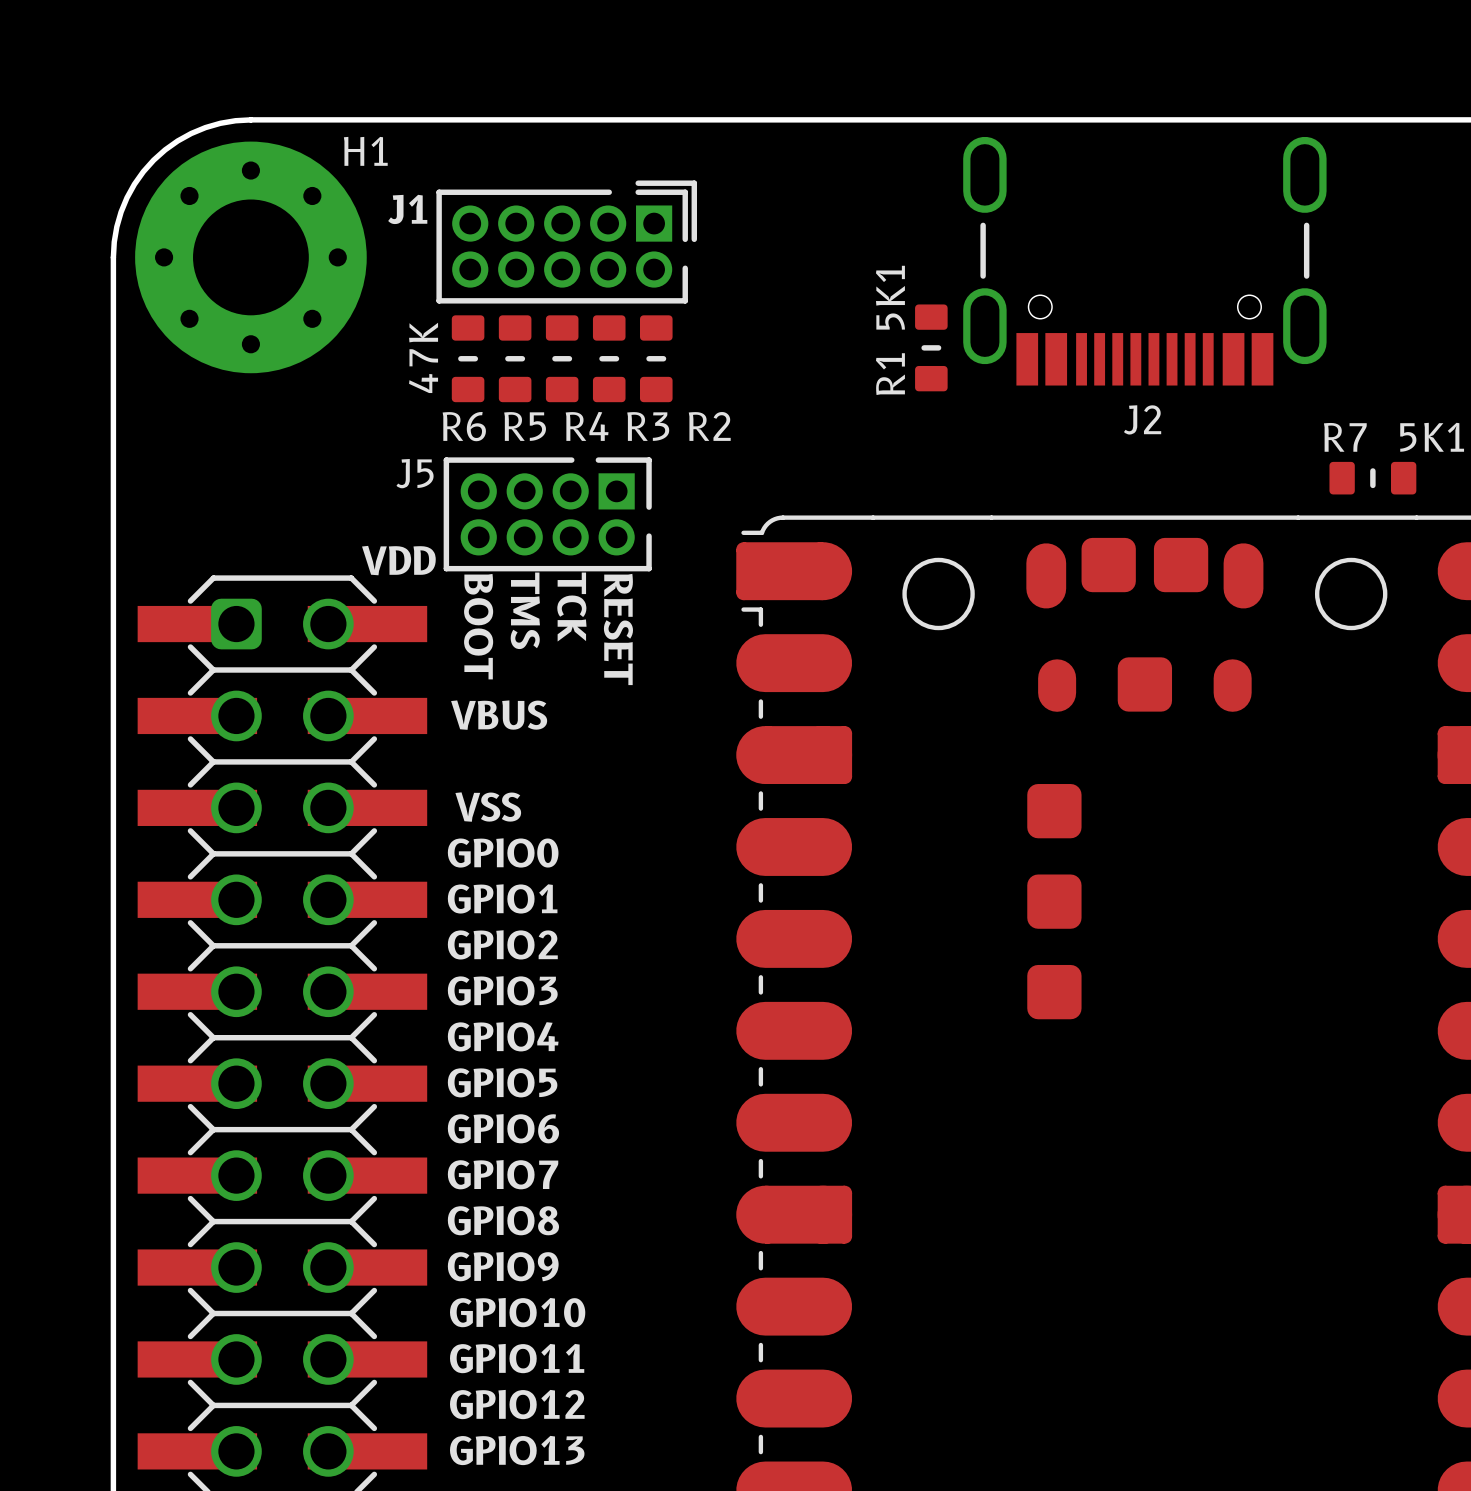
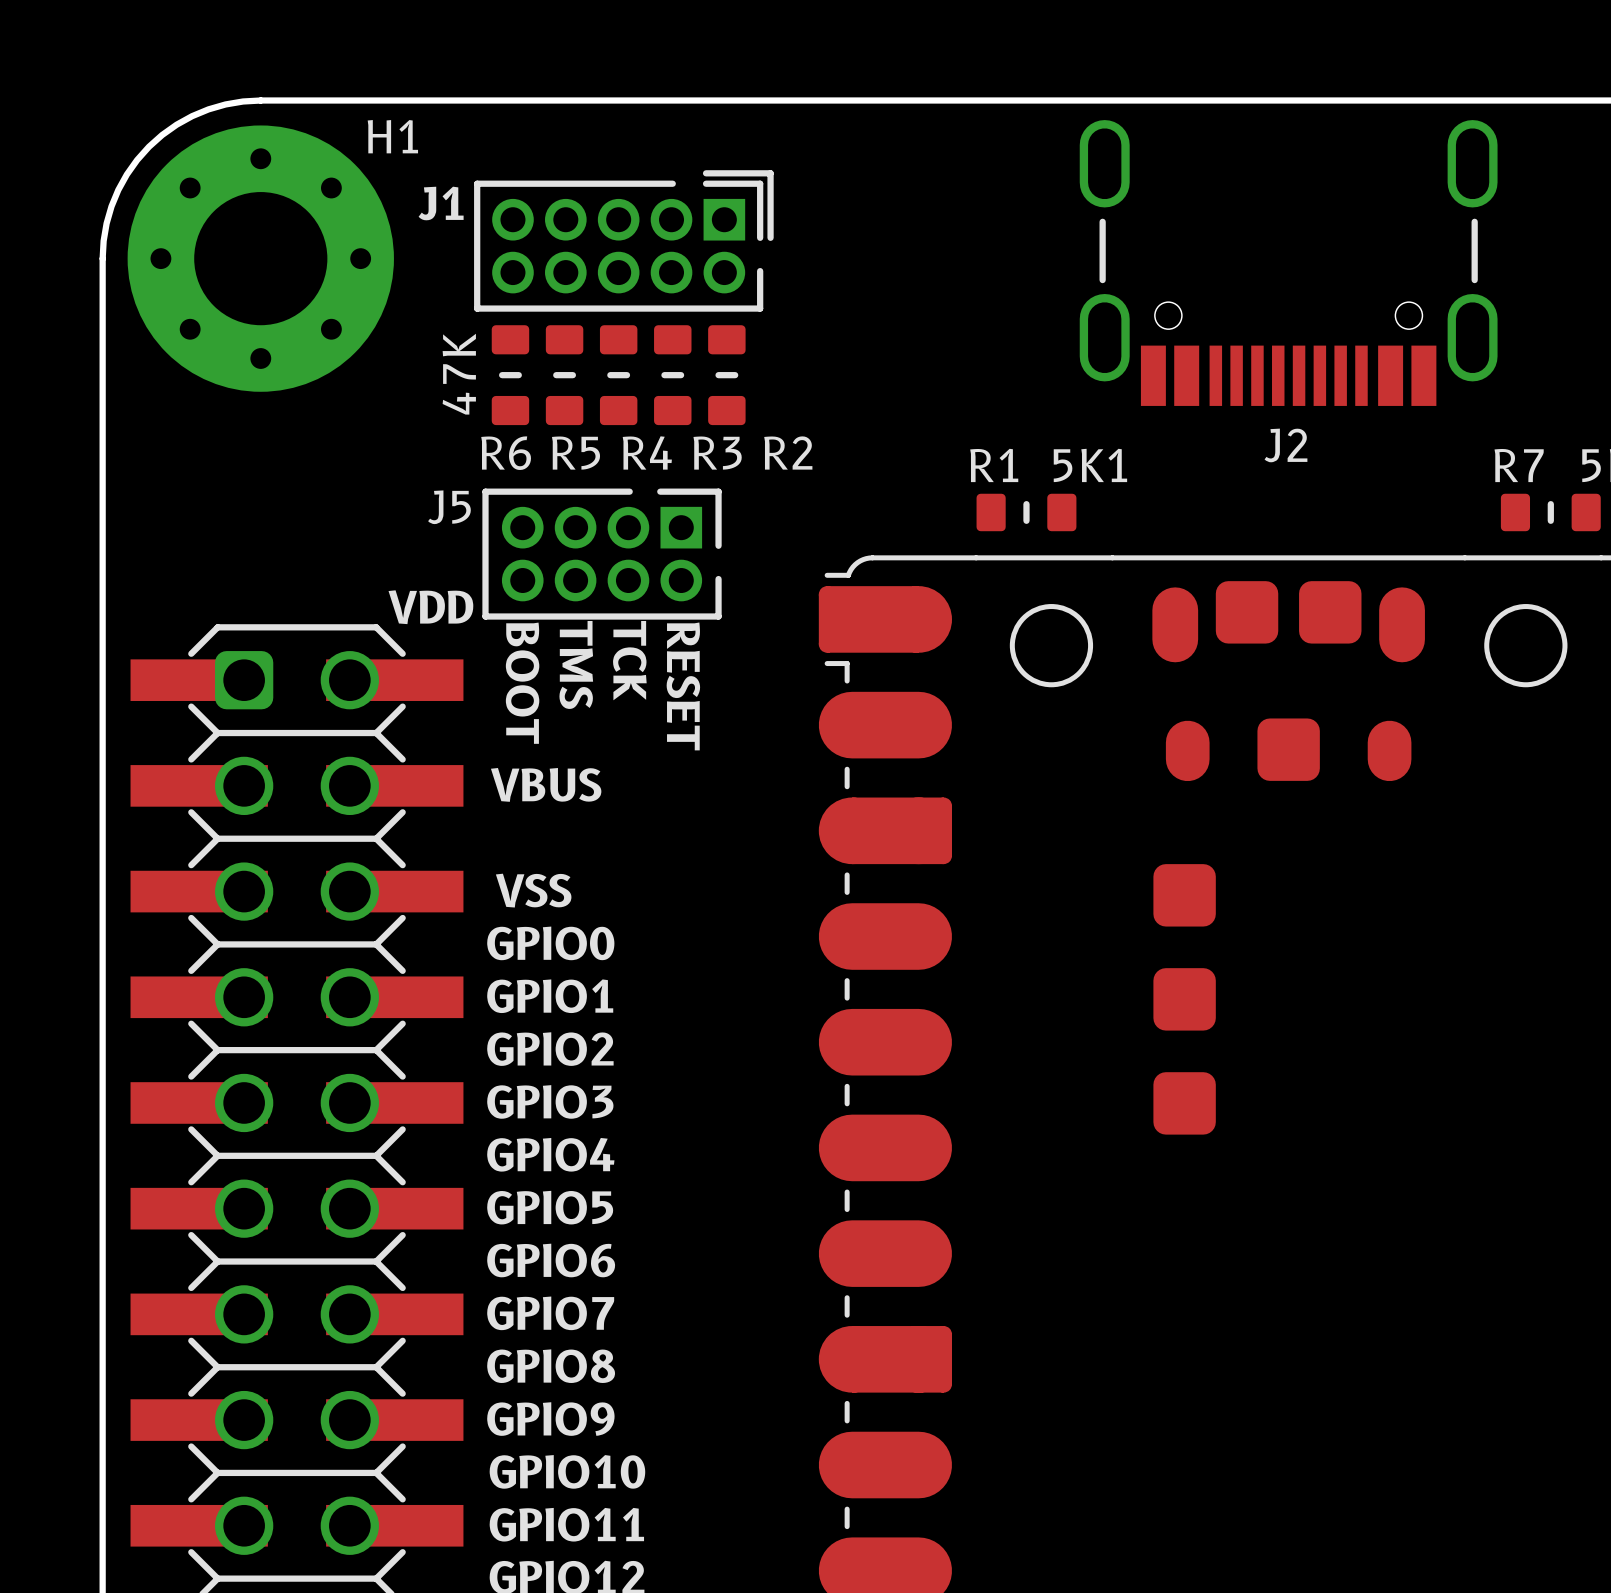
R1 rotation: 0° (931, 347) -> 90° clockwise (1026, 512)
R1 position: (931, 347) -> (1026, 512)

